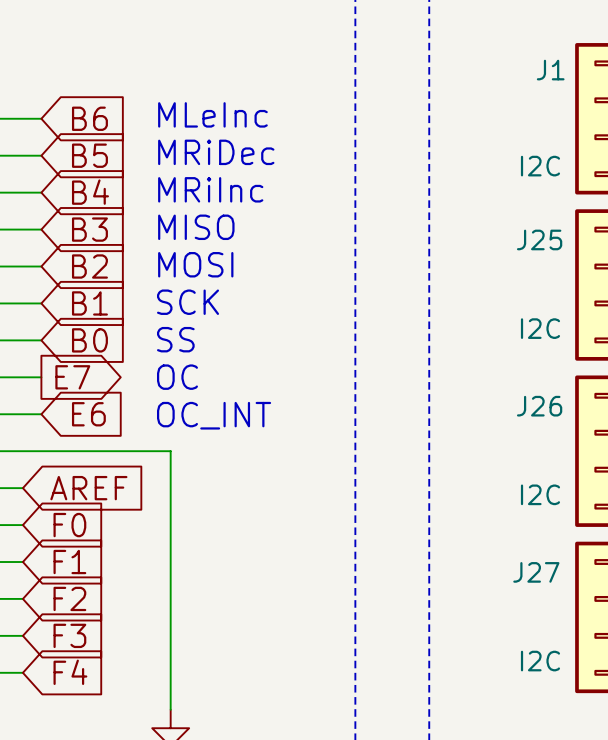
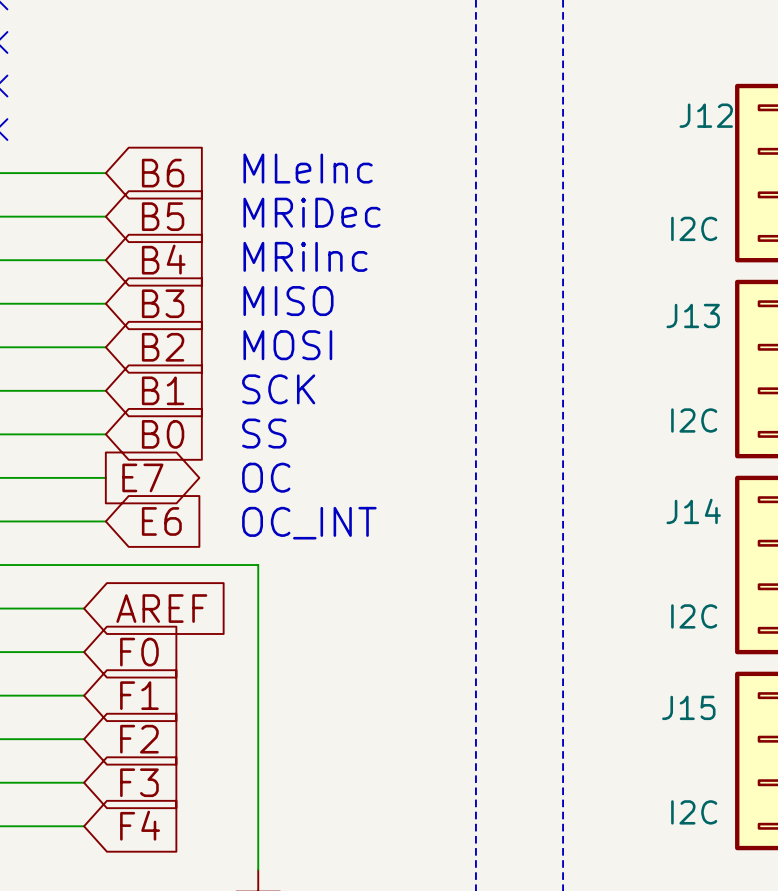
J1 name: J1 (550, 70) -> J12 (706, 115)
J25 name: J25 (539, 239) -> J13 (693, 315)
J26 name: J26 (539, 406) -> J14 (693, 511)
J27 name: J27 (536, 572) -> J15 (688, 707)

